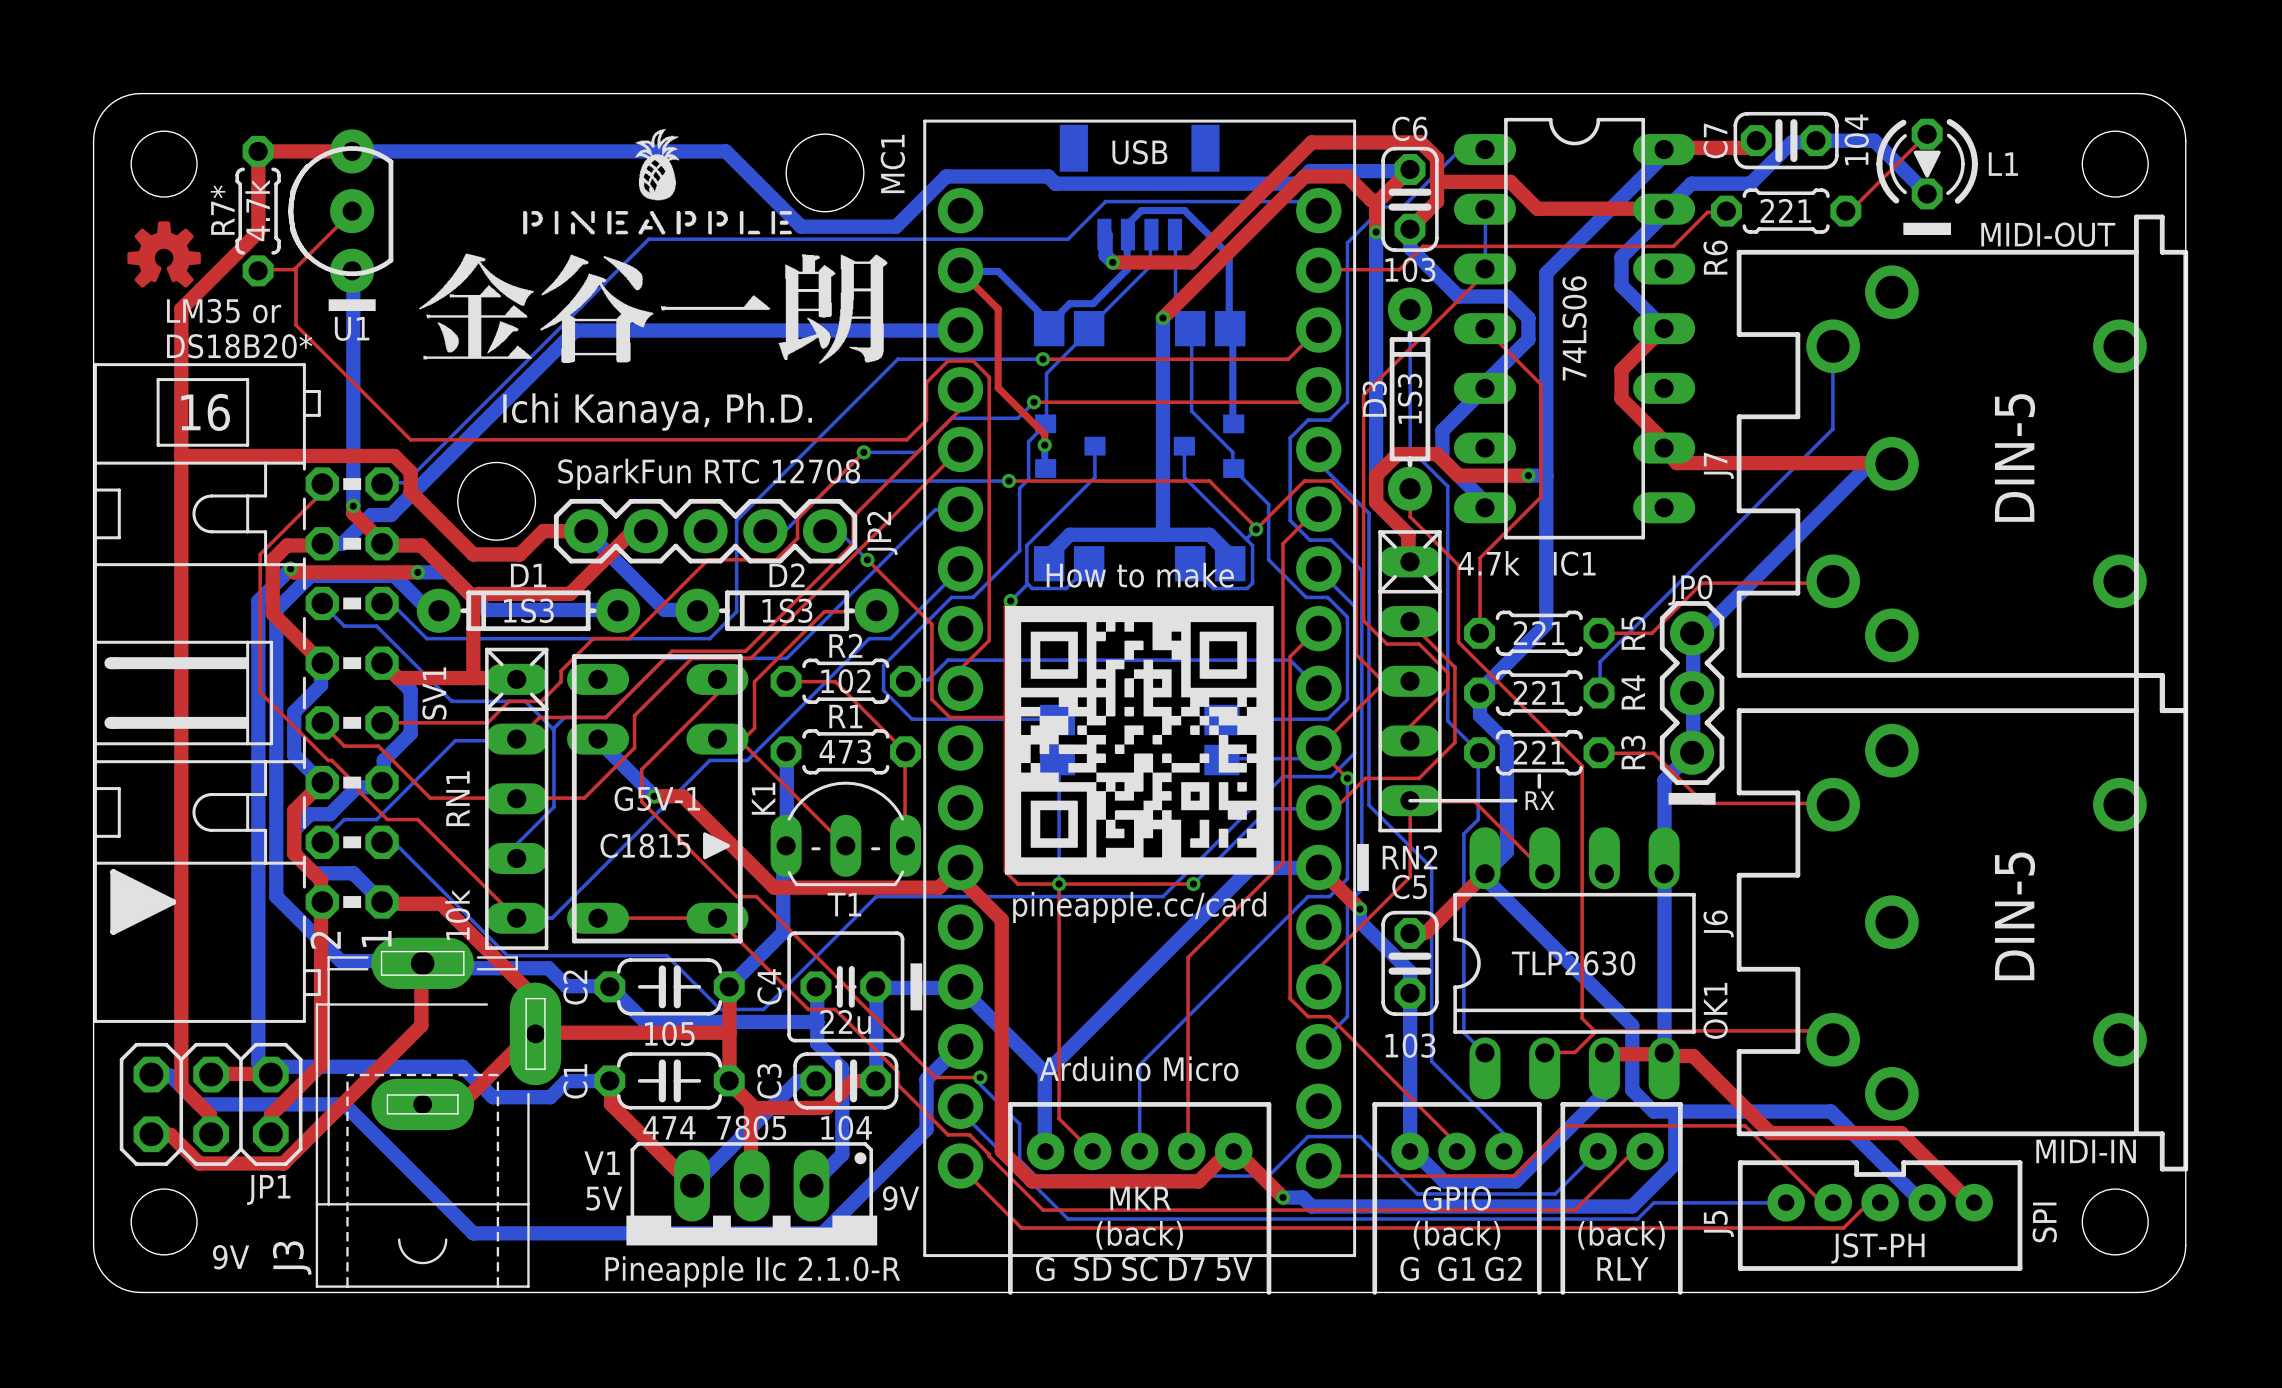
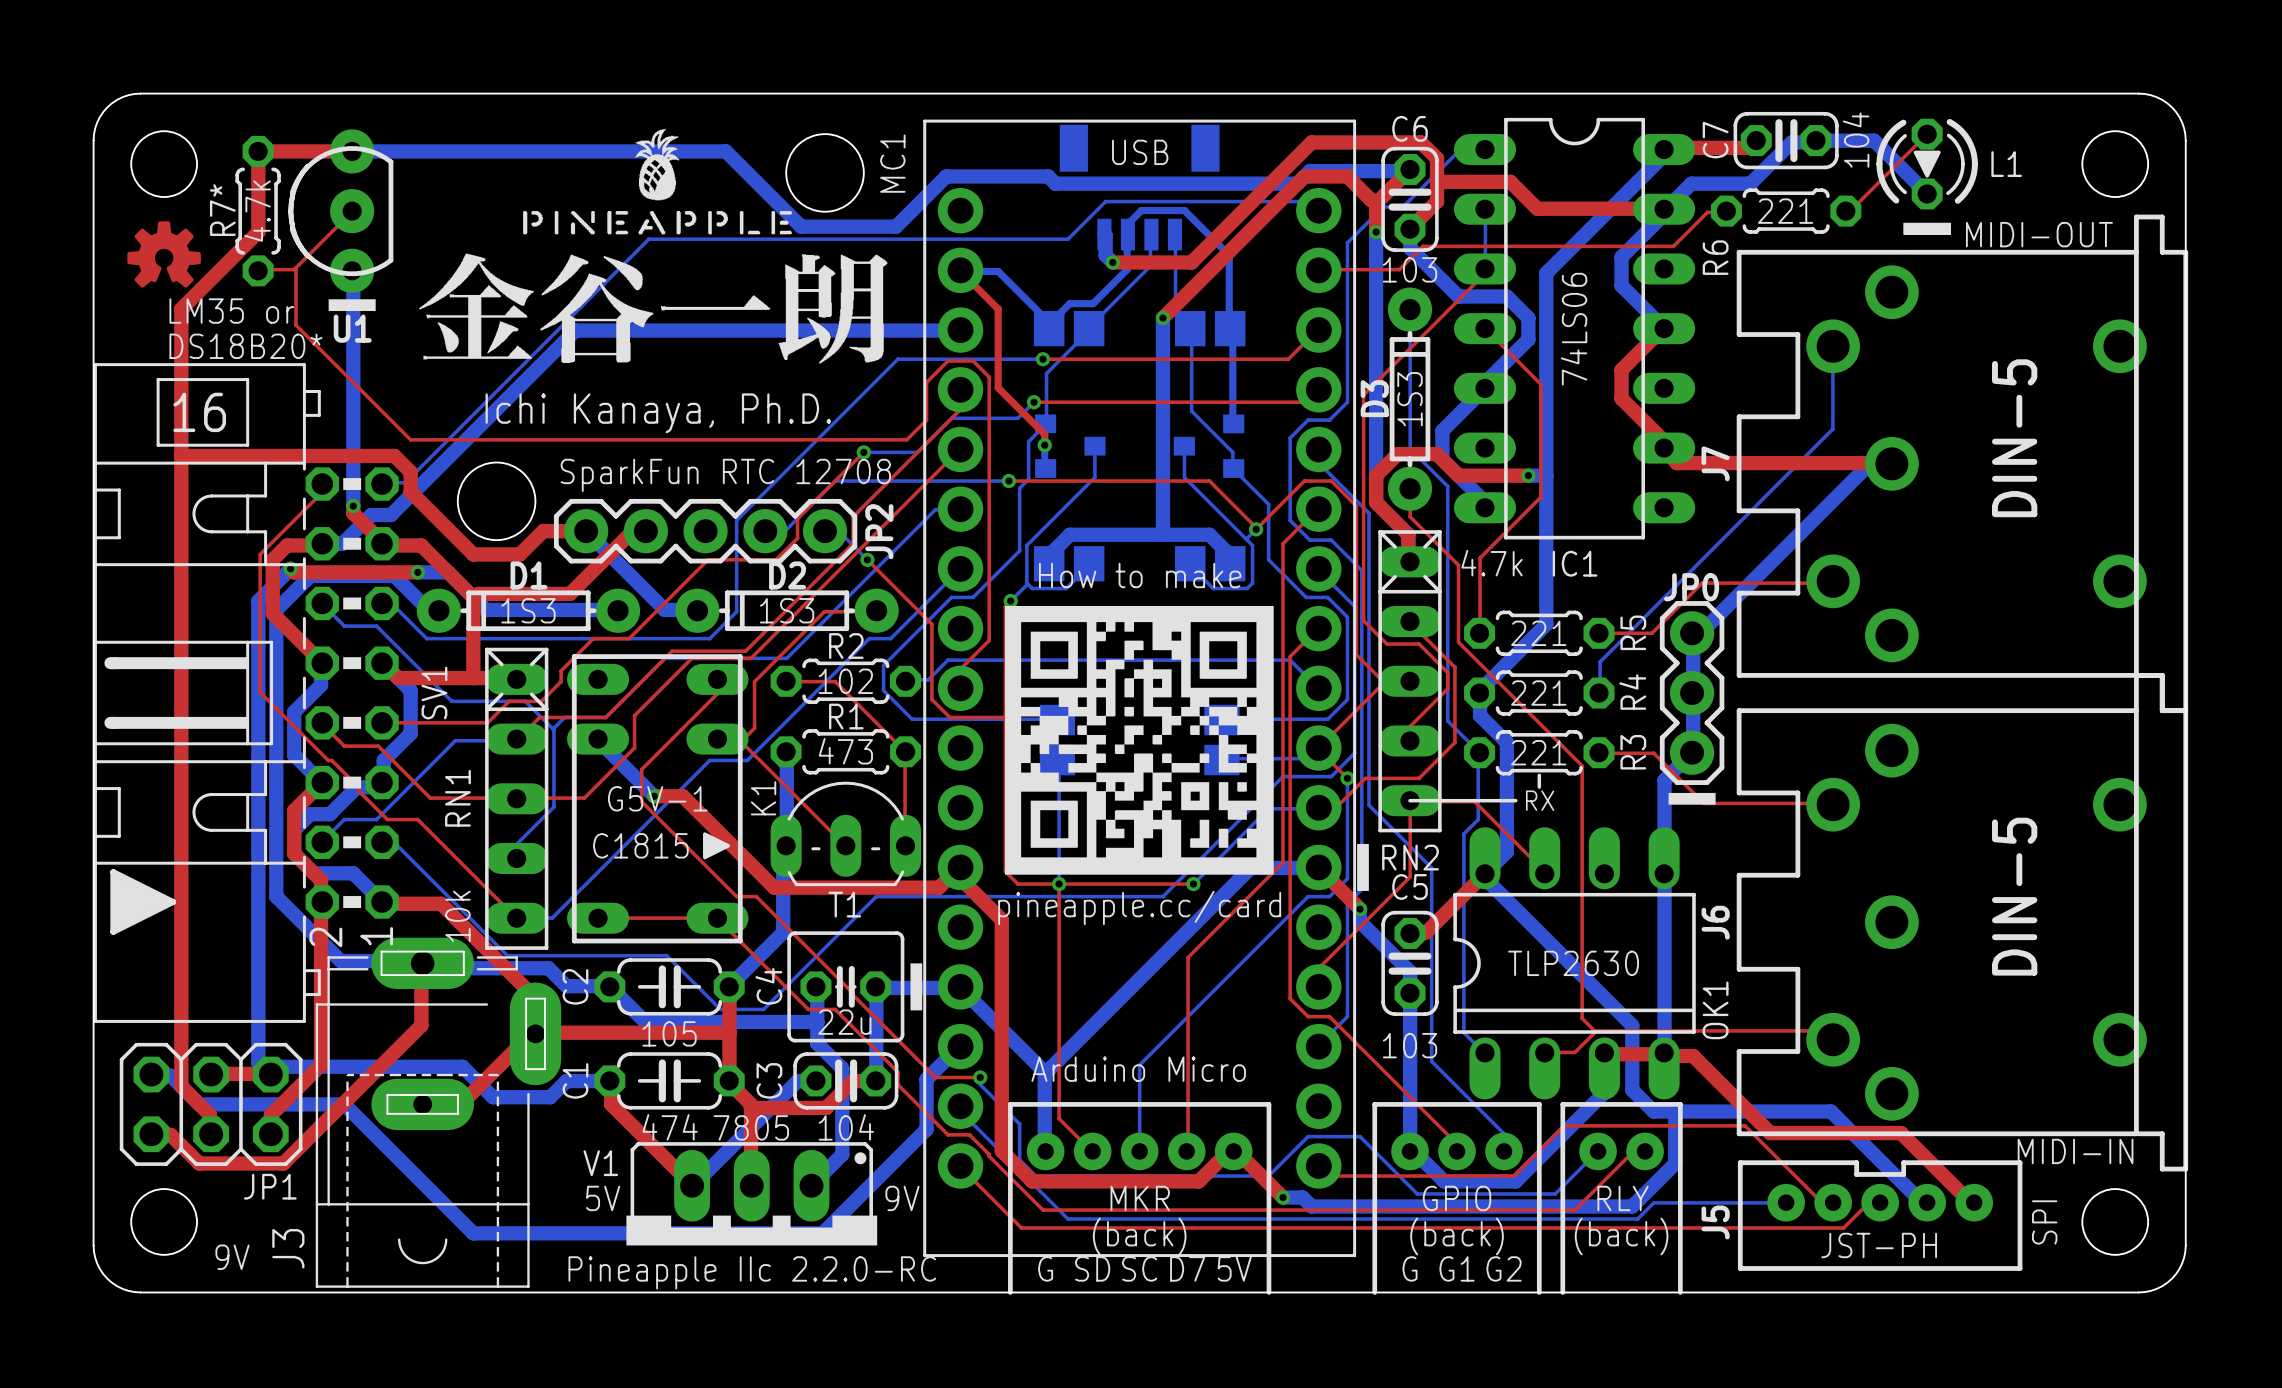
text position: RLY (1623, 1268) -> RLY (1623, 1198)
text: Pineapple IIc 2.1.0-R (752, 1271) -> Pineapple IIc 2.2.0-RC (752, 1272)

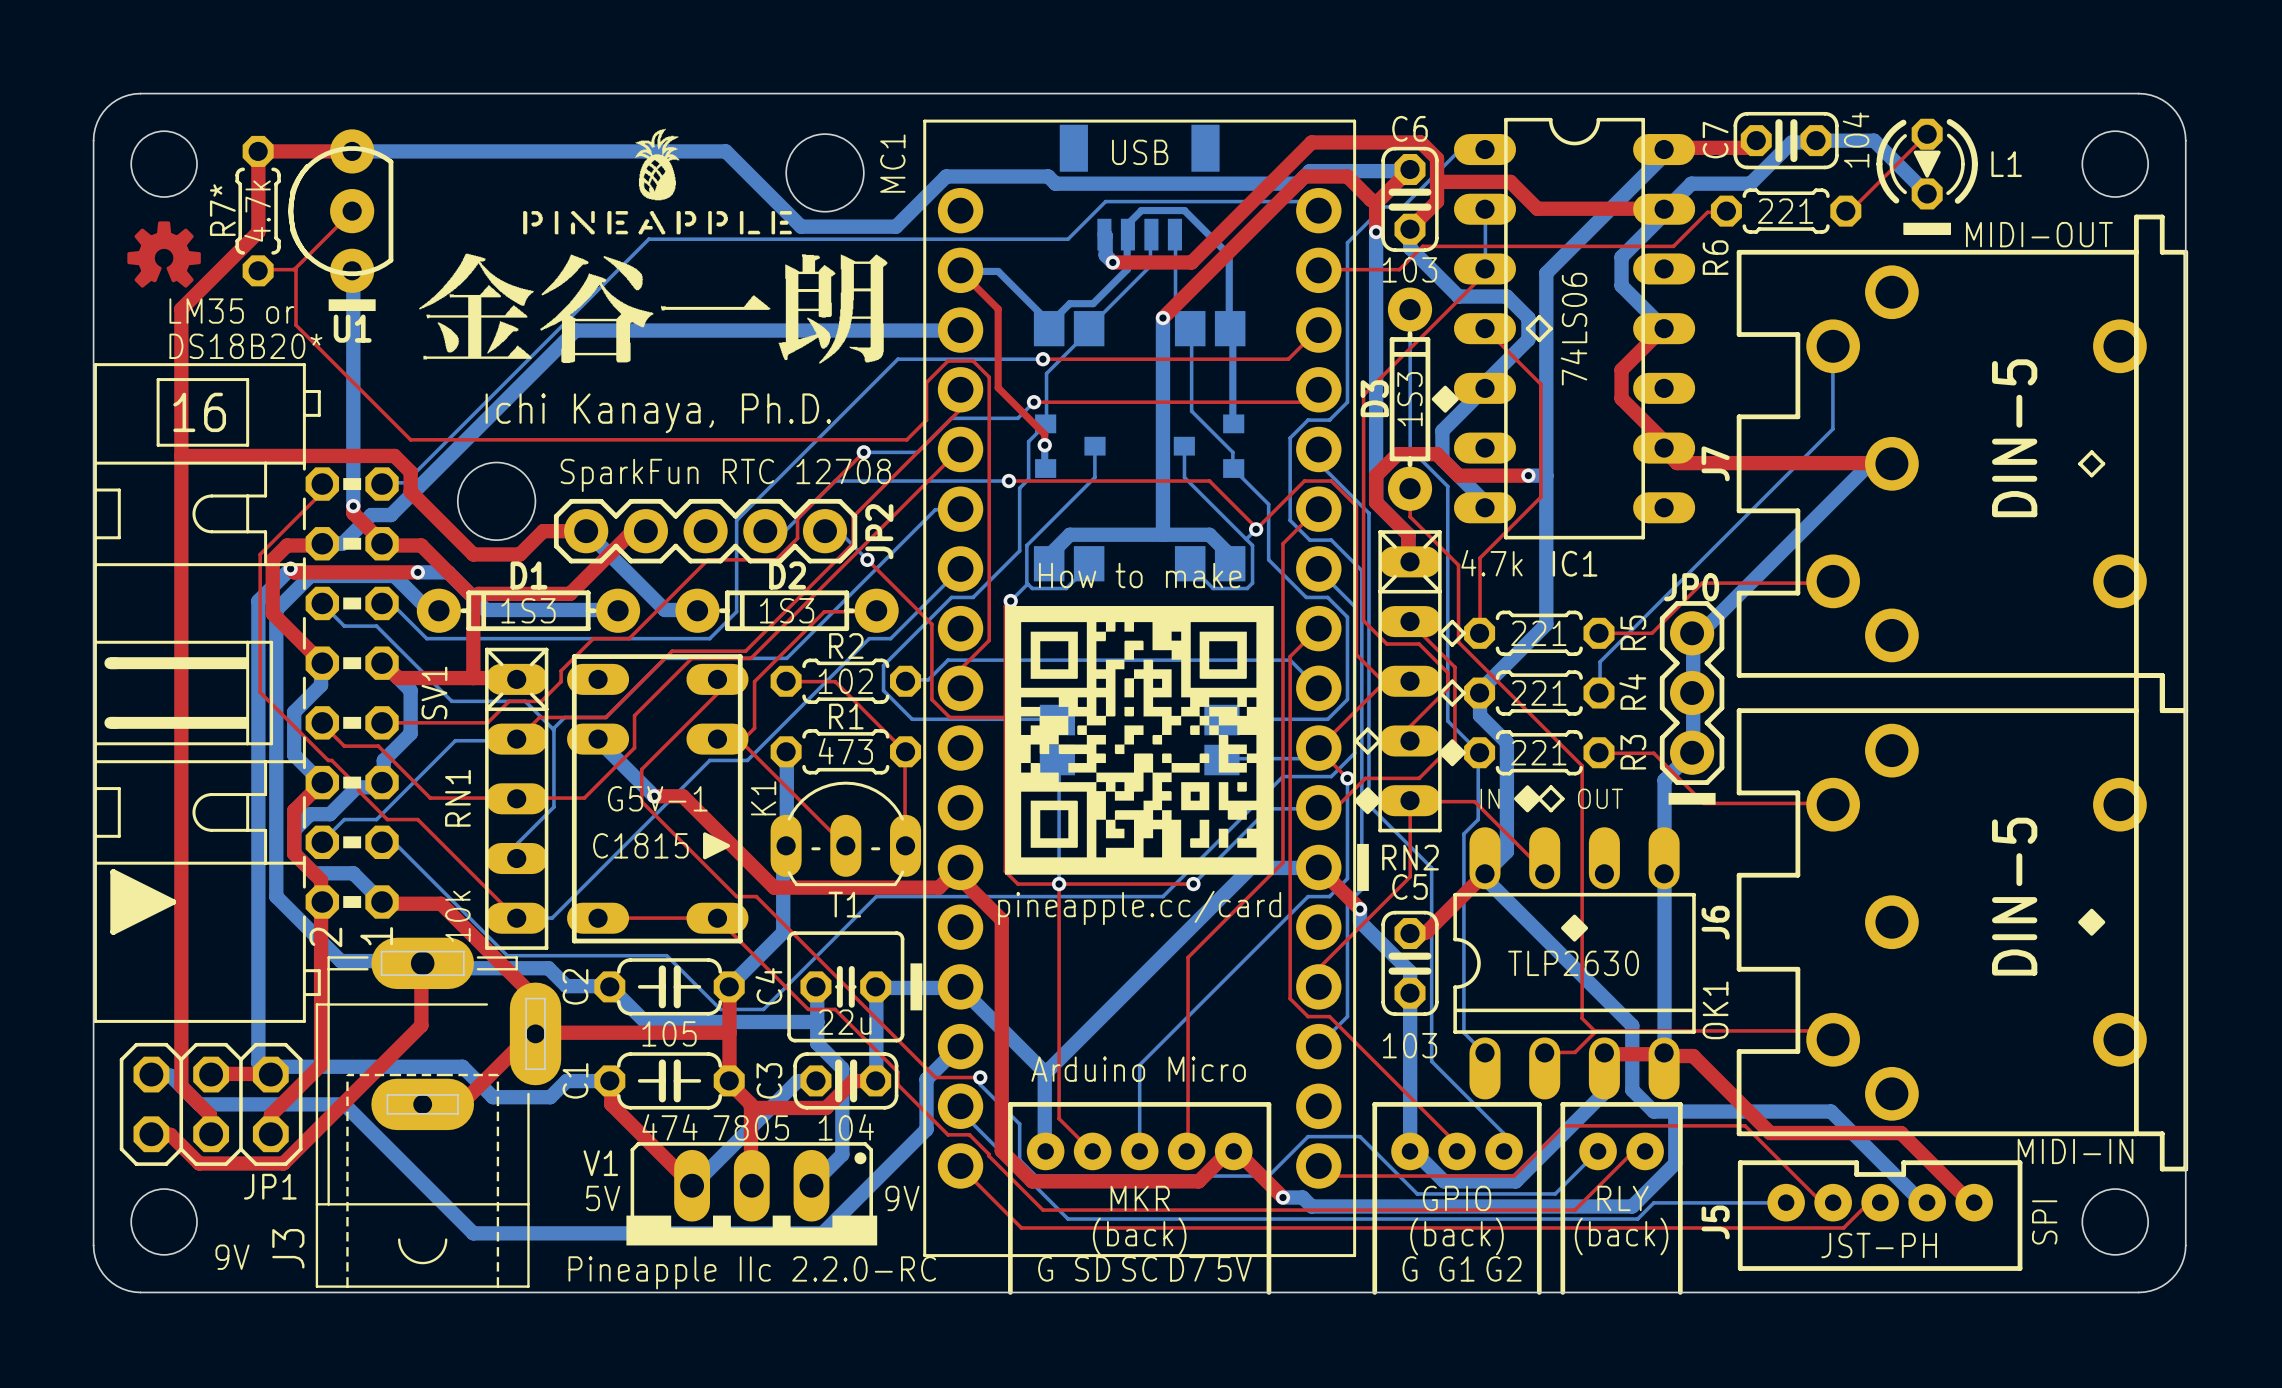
line: none -> (1539, 316) (1527, 328) (1539, 340) (1551, 328) (1539, 316)
drawing: none -> [1431, 385, 1459, 413]
line: none -> (2091, 452) (2079, 463) (2091, 475) (2103, 463) (2091, 452)
line: none -> (1452, 621) (1440, 633) (1452, 645) (1464, 633) (1452, 621)
line: none -> (1452, 681) (1440, 693) (1452, 704) (1464, 693) (1452, 681)
line: none -> (1367, 729) (1355, 740) (1367, 752) (1379, 740) (1367, 729)
drawing: none -> [1438, 739, 1466, 767]
line: (1539, 775) (1539, 787) -> none
drawing: none -> [1514, 785, 1542, 813]
drawing: none -> [1354, 787, 1382, 815]
line: none -> (1551, 787) (1539, 798) (1551, 810) (1562, 798) (1551, 787)
text: none -> IN (1490, 798)
text: none -> OUT (1600, 798)
line: (1410, 800) (1515, 800) -> none
text: RX (1540, 800) -> none
drawing: none -> [2078, 908, 2106, 936]
drawing: none -> [1561, 914, 1589, 942]

